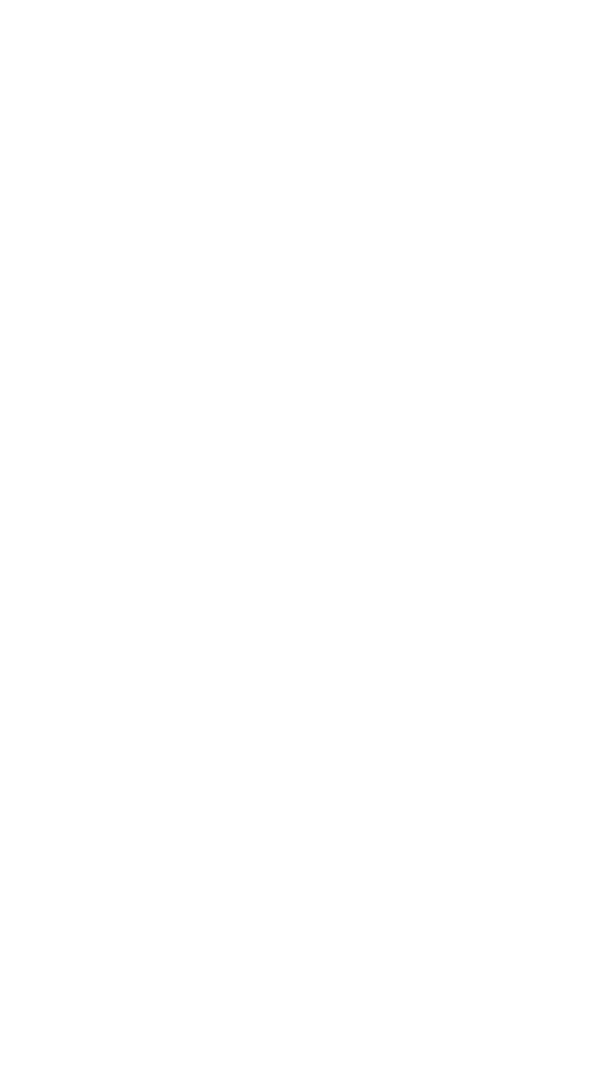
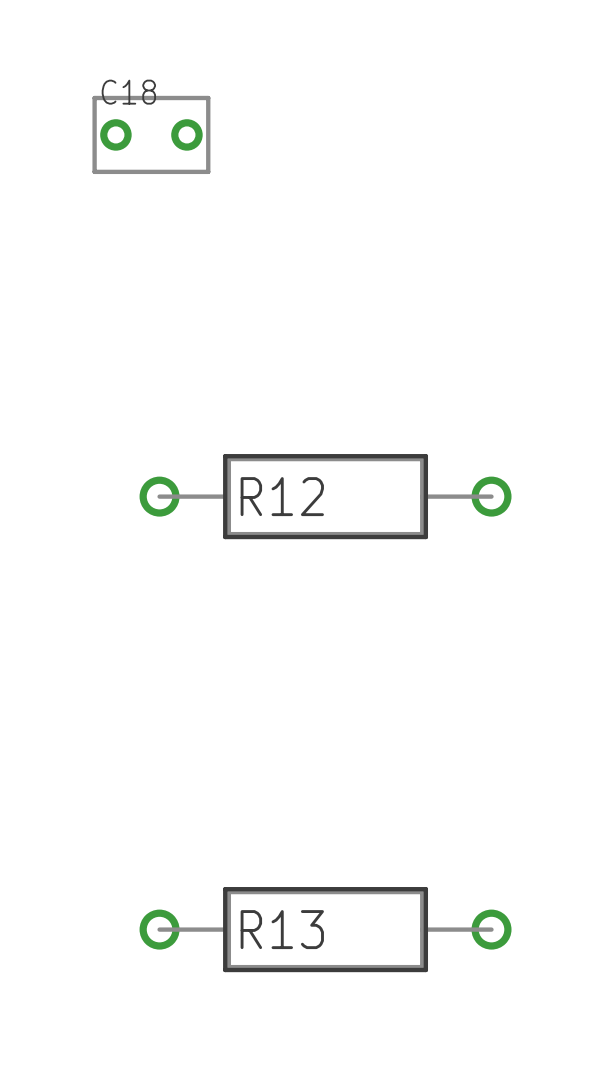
C18: none -> (151, 134)
R12: none -> (325, 496)
R13: none -> (325, 929)

